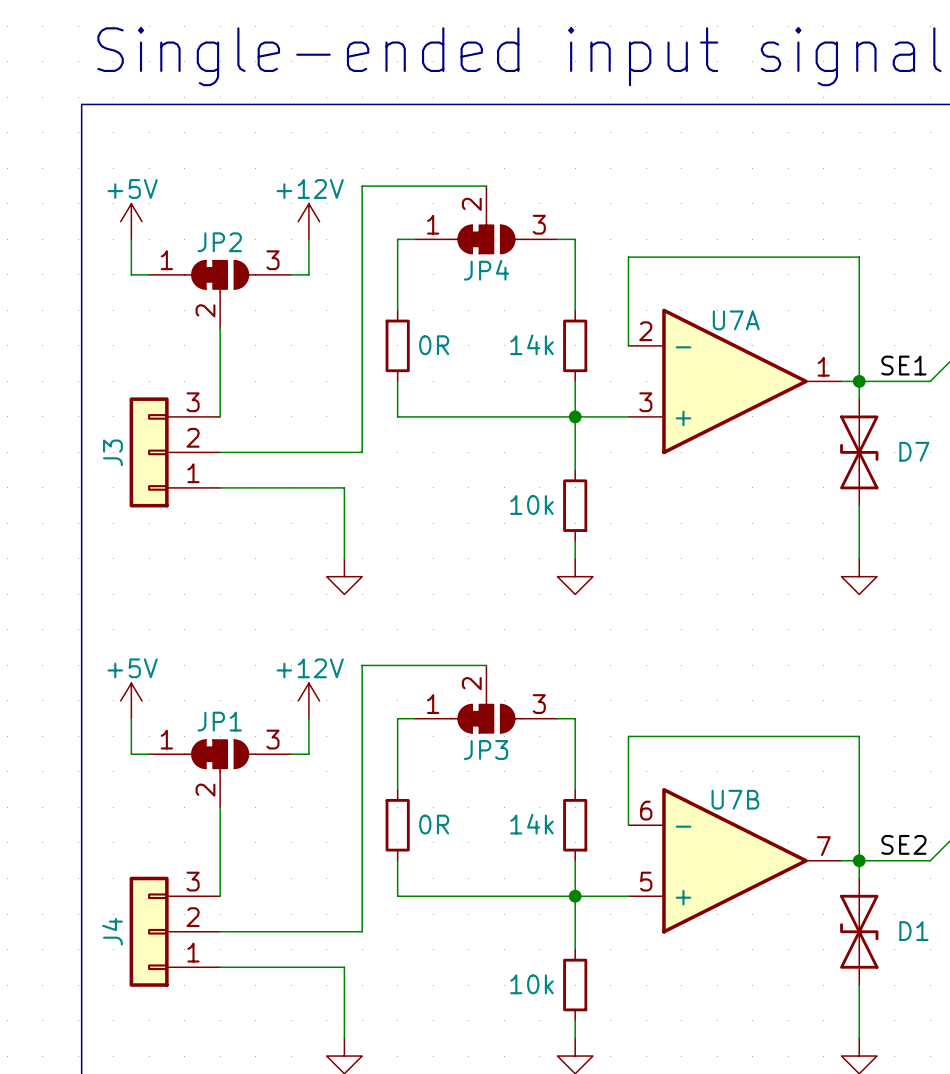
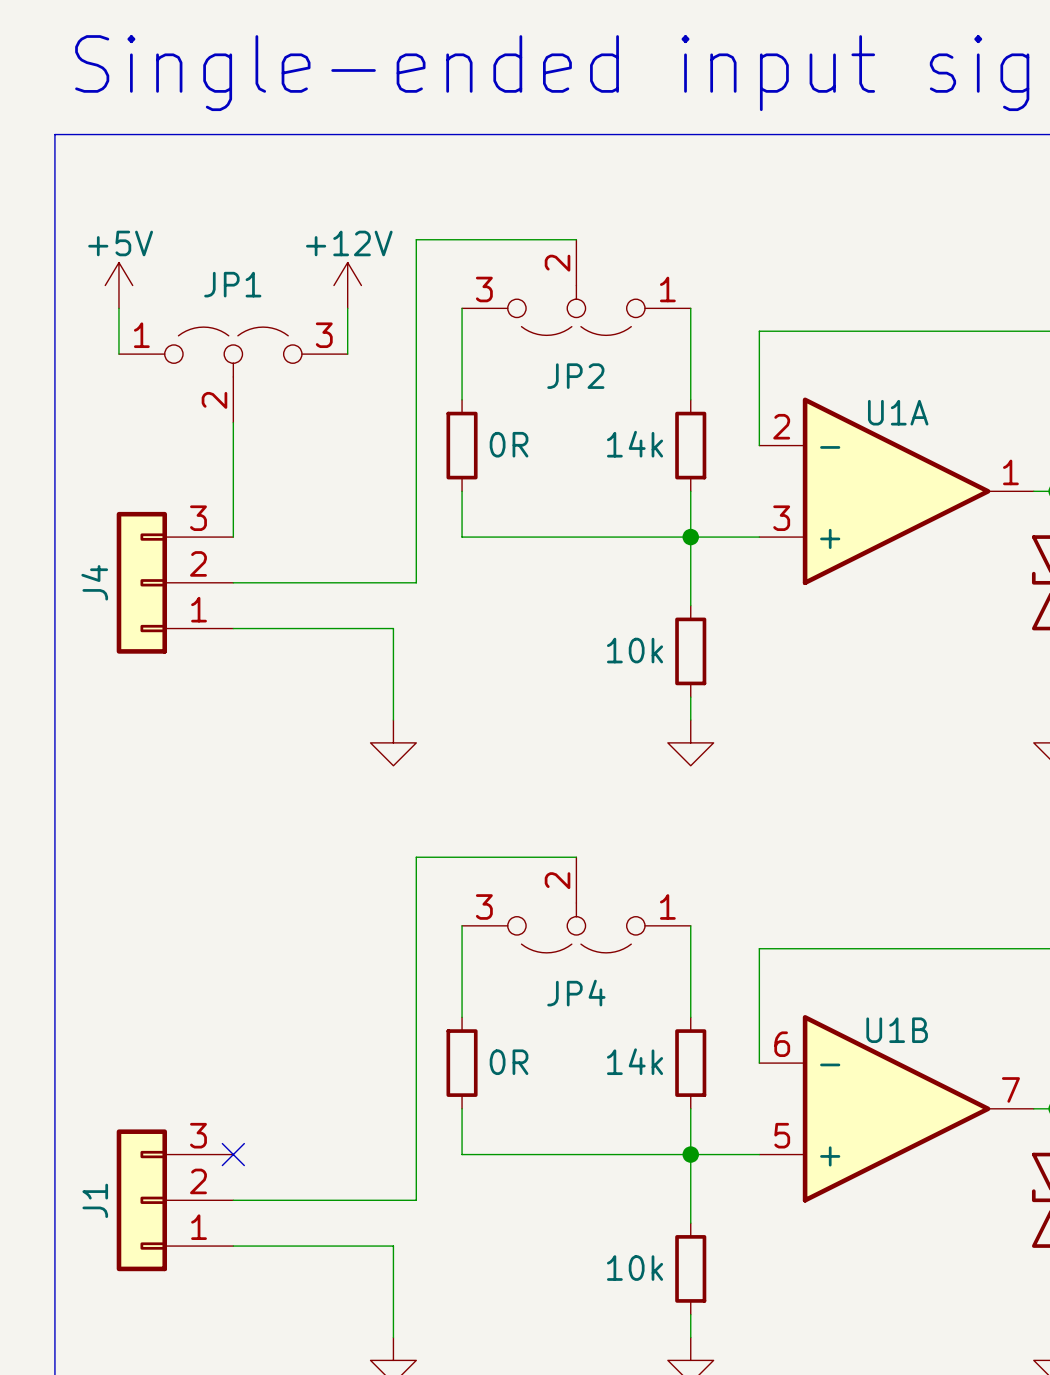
JP4 symbol: [415, 186, 558, 254] -> [462, 857, 691, 953]
JP2 name position: JP2 (219, 242) -> JP2 (575, 376)
JP2 symbol: [149, 260, 292, 329] -> [462, 239, 691, 336]
U7A name: U7A (736, 320) -> U1A (898, 412)
J3 name: J3 (112, 452) -> J4 (94, 582)
JP3: (486, 699) -> none
power symbol: +5V (131, 700) -> none
power symbol: +12V (308, 700) -> none
wire: (131, 718) (131, 754) (149, 754) -> none
wire: (308, 718) (308, 754) (291, 754) -> none
JP1 symbol: [149, 740, 292, 808] -> [118, 327, 348, 423]
U7B name: U7B (735, 799) -> U1B (897, 1030)
wire: (220, 807) (220, 896) -> none
no-connect mark: none -> (233, 1154)
J4 name: J4 (112, 931) -> J1 (95, 1200)

